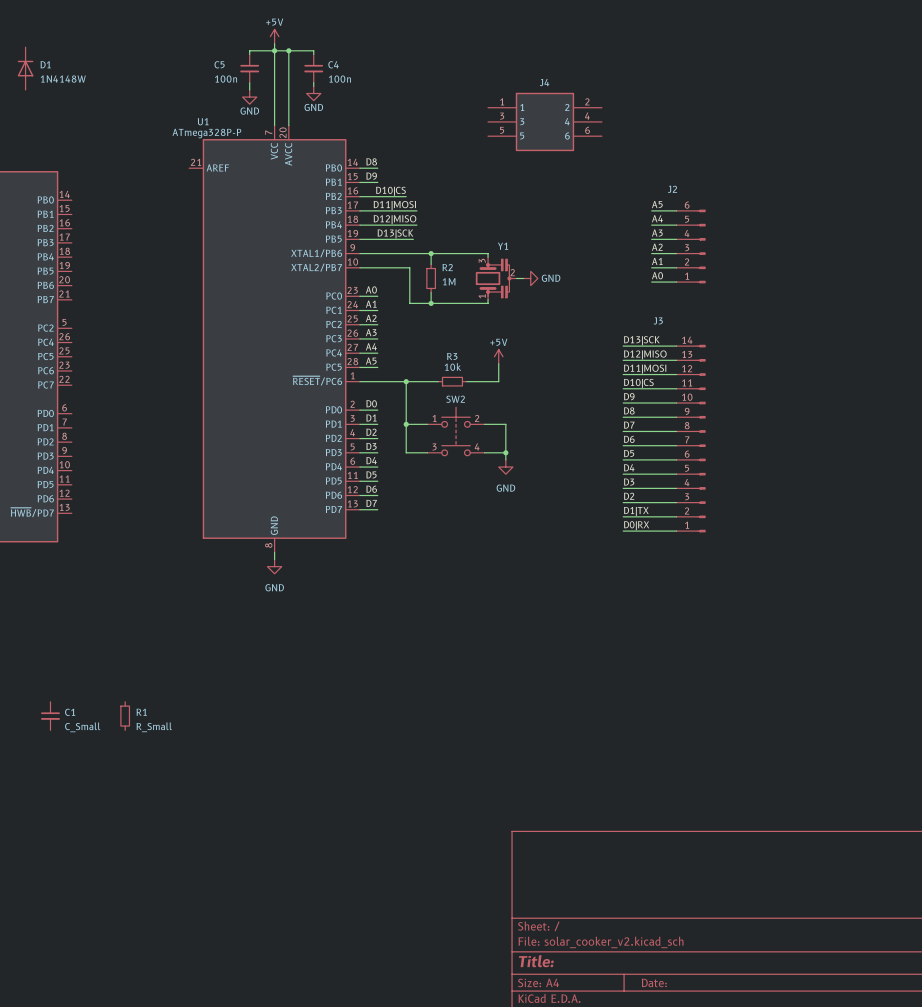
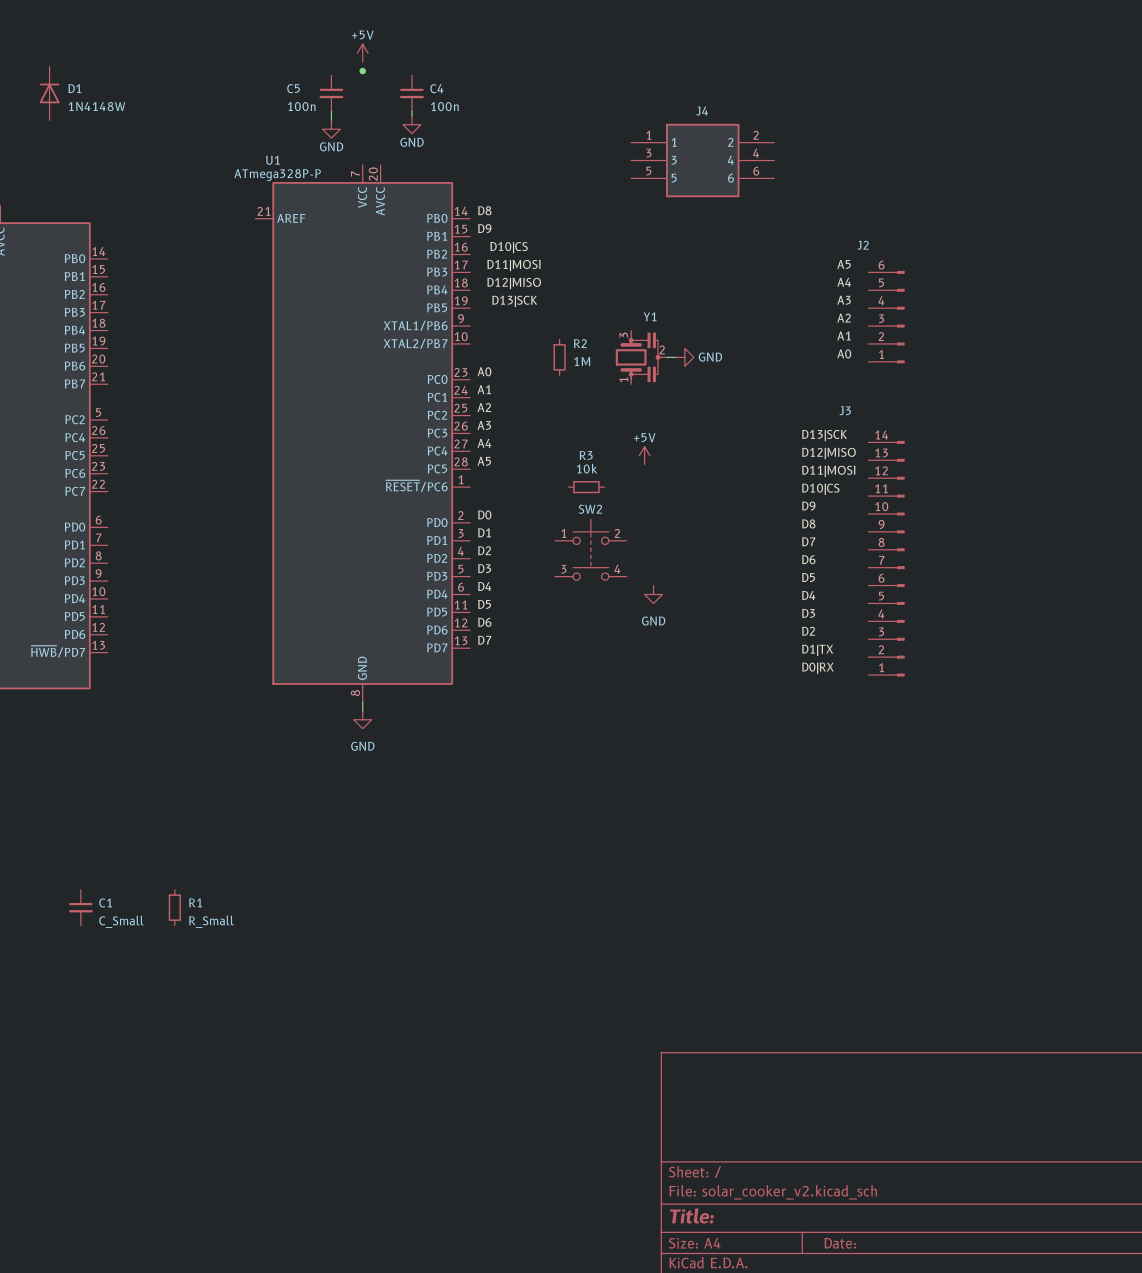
wire: (274, 43) (274, 125) -> none
wire: (288, 50) (288, 125) -> none
junction: (288, 50) -> none
wire: (249, 54) (249, 50) (313, 50) (313, 54) -> none
wire: (359, 168) (377, 168) -> none
wire: (359, 182) (377, 182) -> none
wire: (359, 196) (406, 196) -> none
wire: (359, 210) (416, 210) -> none
wire: (651, 210) (676, 210) -> none
wire: (359, 225) (416, 225) -> none
wire: (651, 225) (676, 225) -> none
wire: (359, 239) (413, 239) -> none
wire: (651, 239) (676, 239) -> none
wire: (359, 253) (488, 253) (488, 257) -> none
wire: (431, 253) (431, 264) -> none
junction: (431, 253) -> none
wire: (651, 253) (676, 253) -> none
wire: (359, 267) (409, 267) (409, 303) (488, 303) (488, 299) -> none
wire: (651, 267) (676, 267) -> none
wire: (651, 282) (676, 282) -> none
wire: (431, 292) (431, 303) -> none
wire: (359, 296) (377, 296) -> none
junction: (431, 303) -> none
wire: (359, 310) (377, 310) -> none
wire: (359, 324) (377, 324) -> none
wire: (359, 338) (377, 338) -> none
wire: (623, 346) (676, 346) -> none
wire: (359, 353) (377, 353) -> none
wire: (623, 360) (676, 360) -> none
wire: (498, 363) (498, 381) (466, 381) -> none
wire: (359, 367) (377, 367) -> none
wire: (623, 374) (676, 374) -> none
wire: (359, 381) (438, 381) -> none
wire: (406, 381) (406, 452) (427, 452) -> none
junction: (406, 381) -> none
wire: (623, 388) (676, 388) -> none
wire: (623, 403) (676, 403) -> none
wire: (359, 410) (377, 410) -> none
wire: (623, 417) (676, 417) -> none
wire: (359, 424) (377, 424) -> none
wire: (406, 424) (427, 424) -> none
junction: (406, 424) -> none
wire: (484, 424) (505, 424) (505, 459) -> none
wire: (623, 431) (676, 431) -> none
wire: (359, 438) (377, 438) -> none
wire: (623, 445) (676, 445) -> none
wire: (359, 452) (377, 452) -> none
wire: (484, 452) (505, 452) -> none
junction: (505, 452) -> none
wire: (623, 459) (676, 459) -> none
wire: (359, 467) (377, 467) -> none
wire: (623, 474) (676, 474) -> none
wire: (359, 481) (377, 481) -> none
wire: (623, 488) (676, 488) -> none
wire: (359, 495) (377, 495) -> none
wire: (623, 502) (676, 502) -> none
wire: (359, 509) (377, 509) -> none
wire: (623, 516) (676, 516) -> none
wire: (623, 531) (676, 531) -> none

